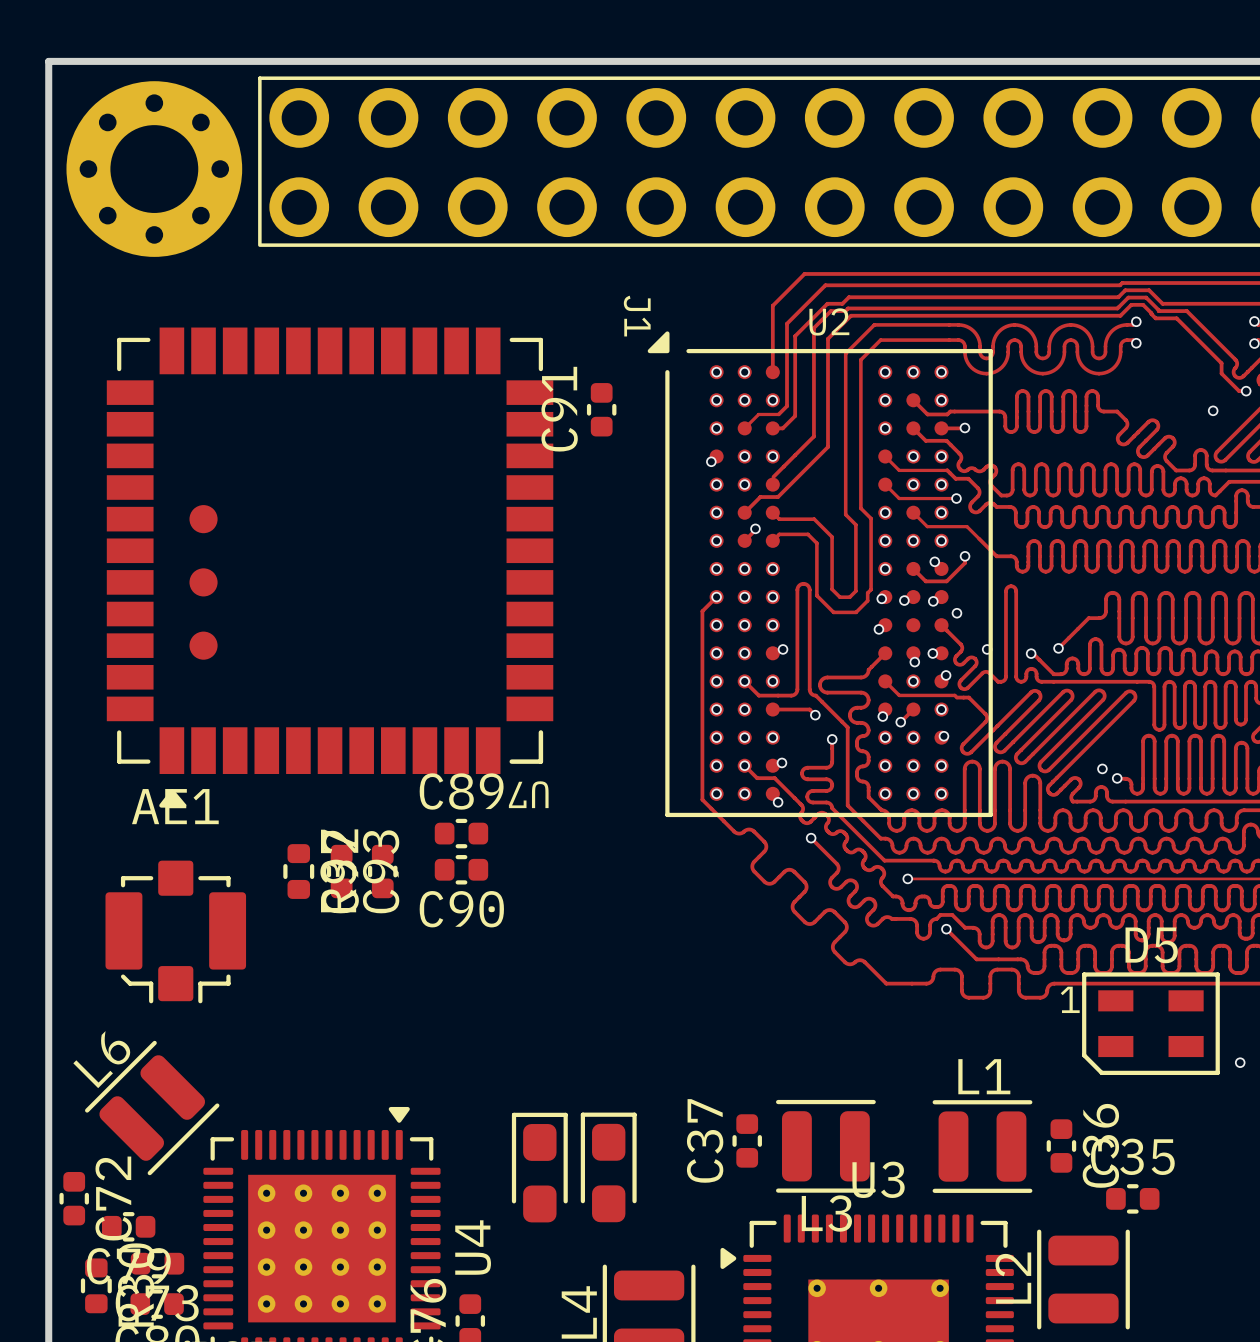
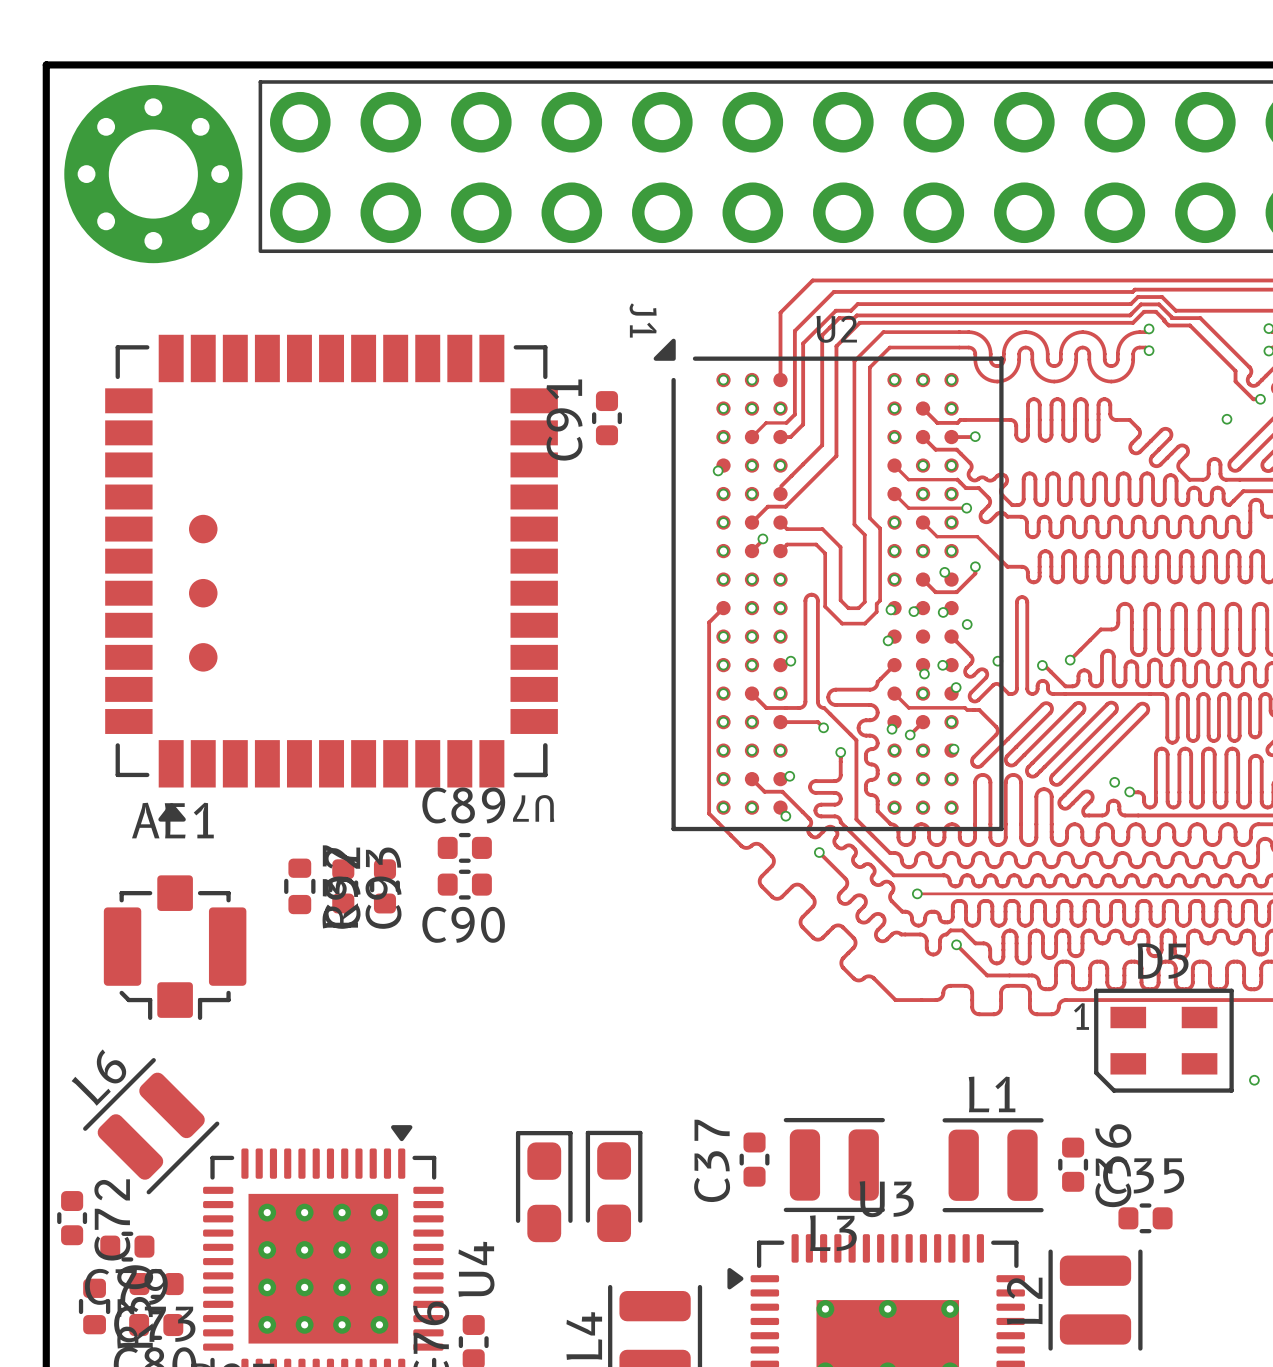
via: (716, 597) -> none
via: (744, 681) -> none
via: (744, 765) -> none

